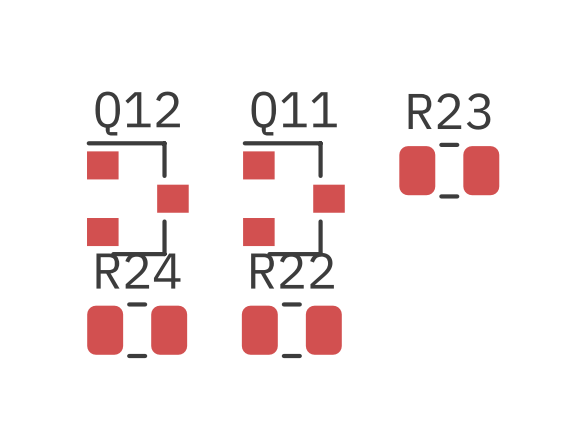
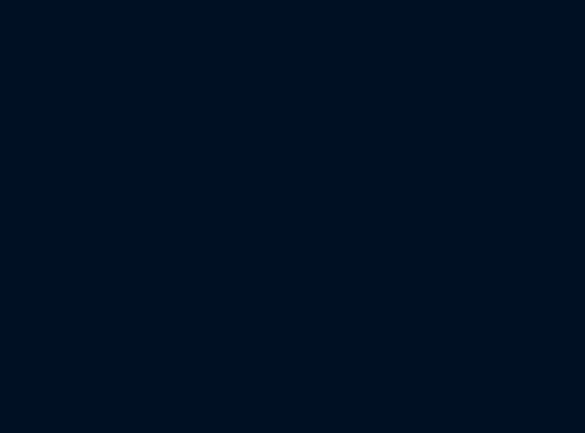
R23: (449, 170) -> none
Q12: (137, 198) -> none
Q11: (293, 198) -> none
R24: (137, 330) -> none
R22: (291, 330) -> none

